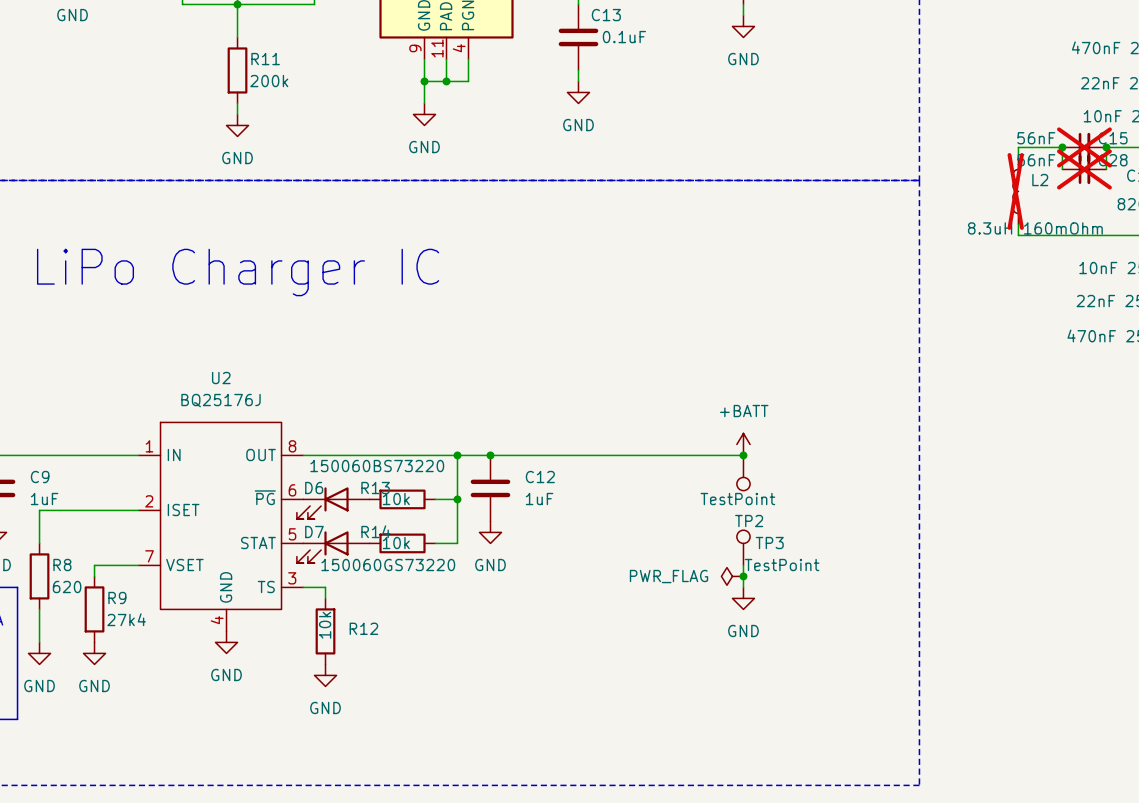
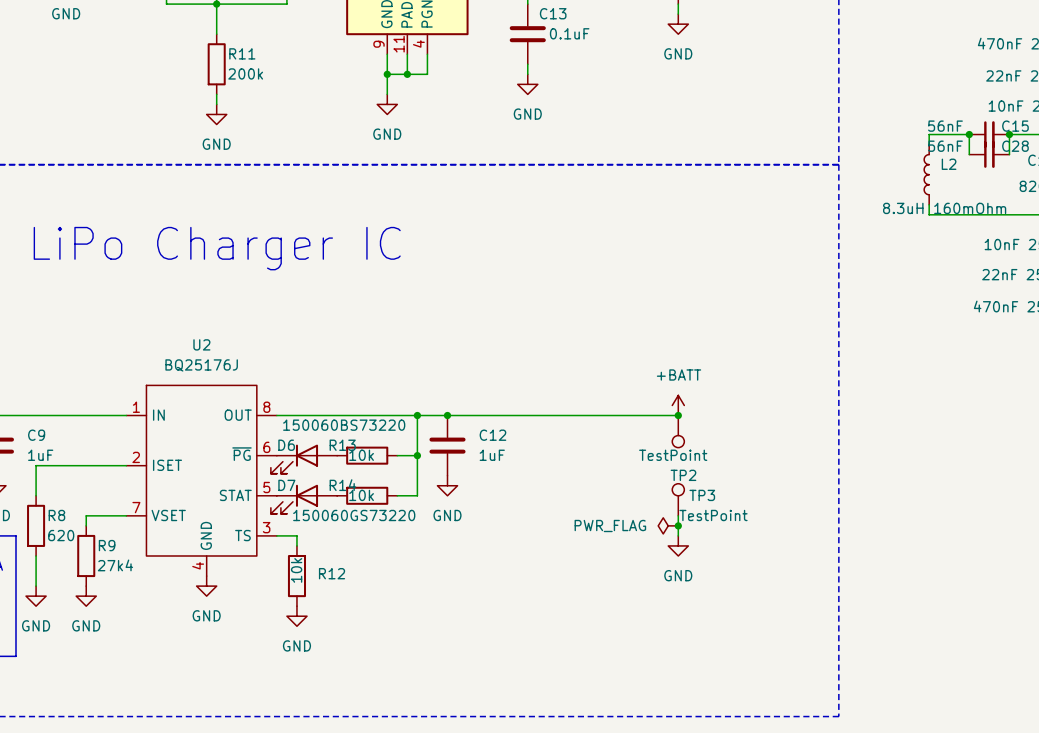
C15 do-not-place cross: (1084, 147) -> none
C28 do-not-place cross: (1084, 169) -> none
L2 do-not-place cross: (1015, 191) -> none

